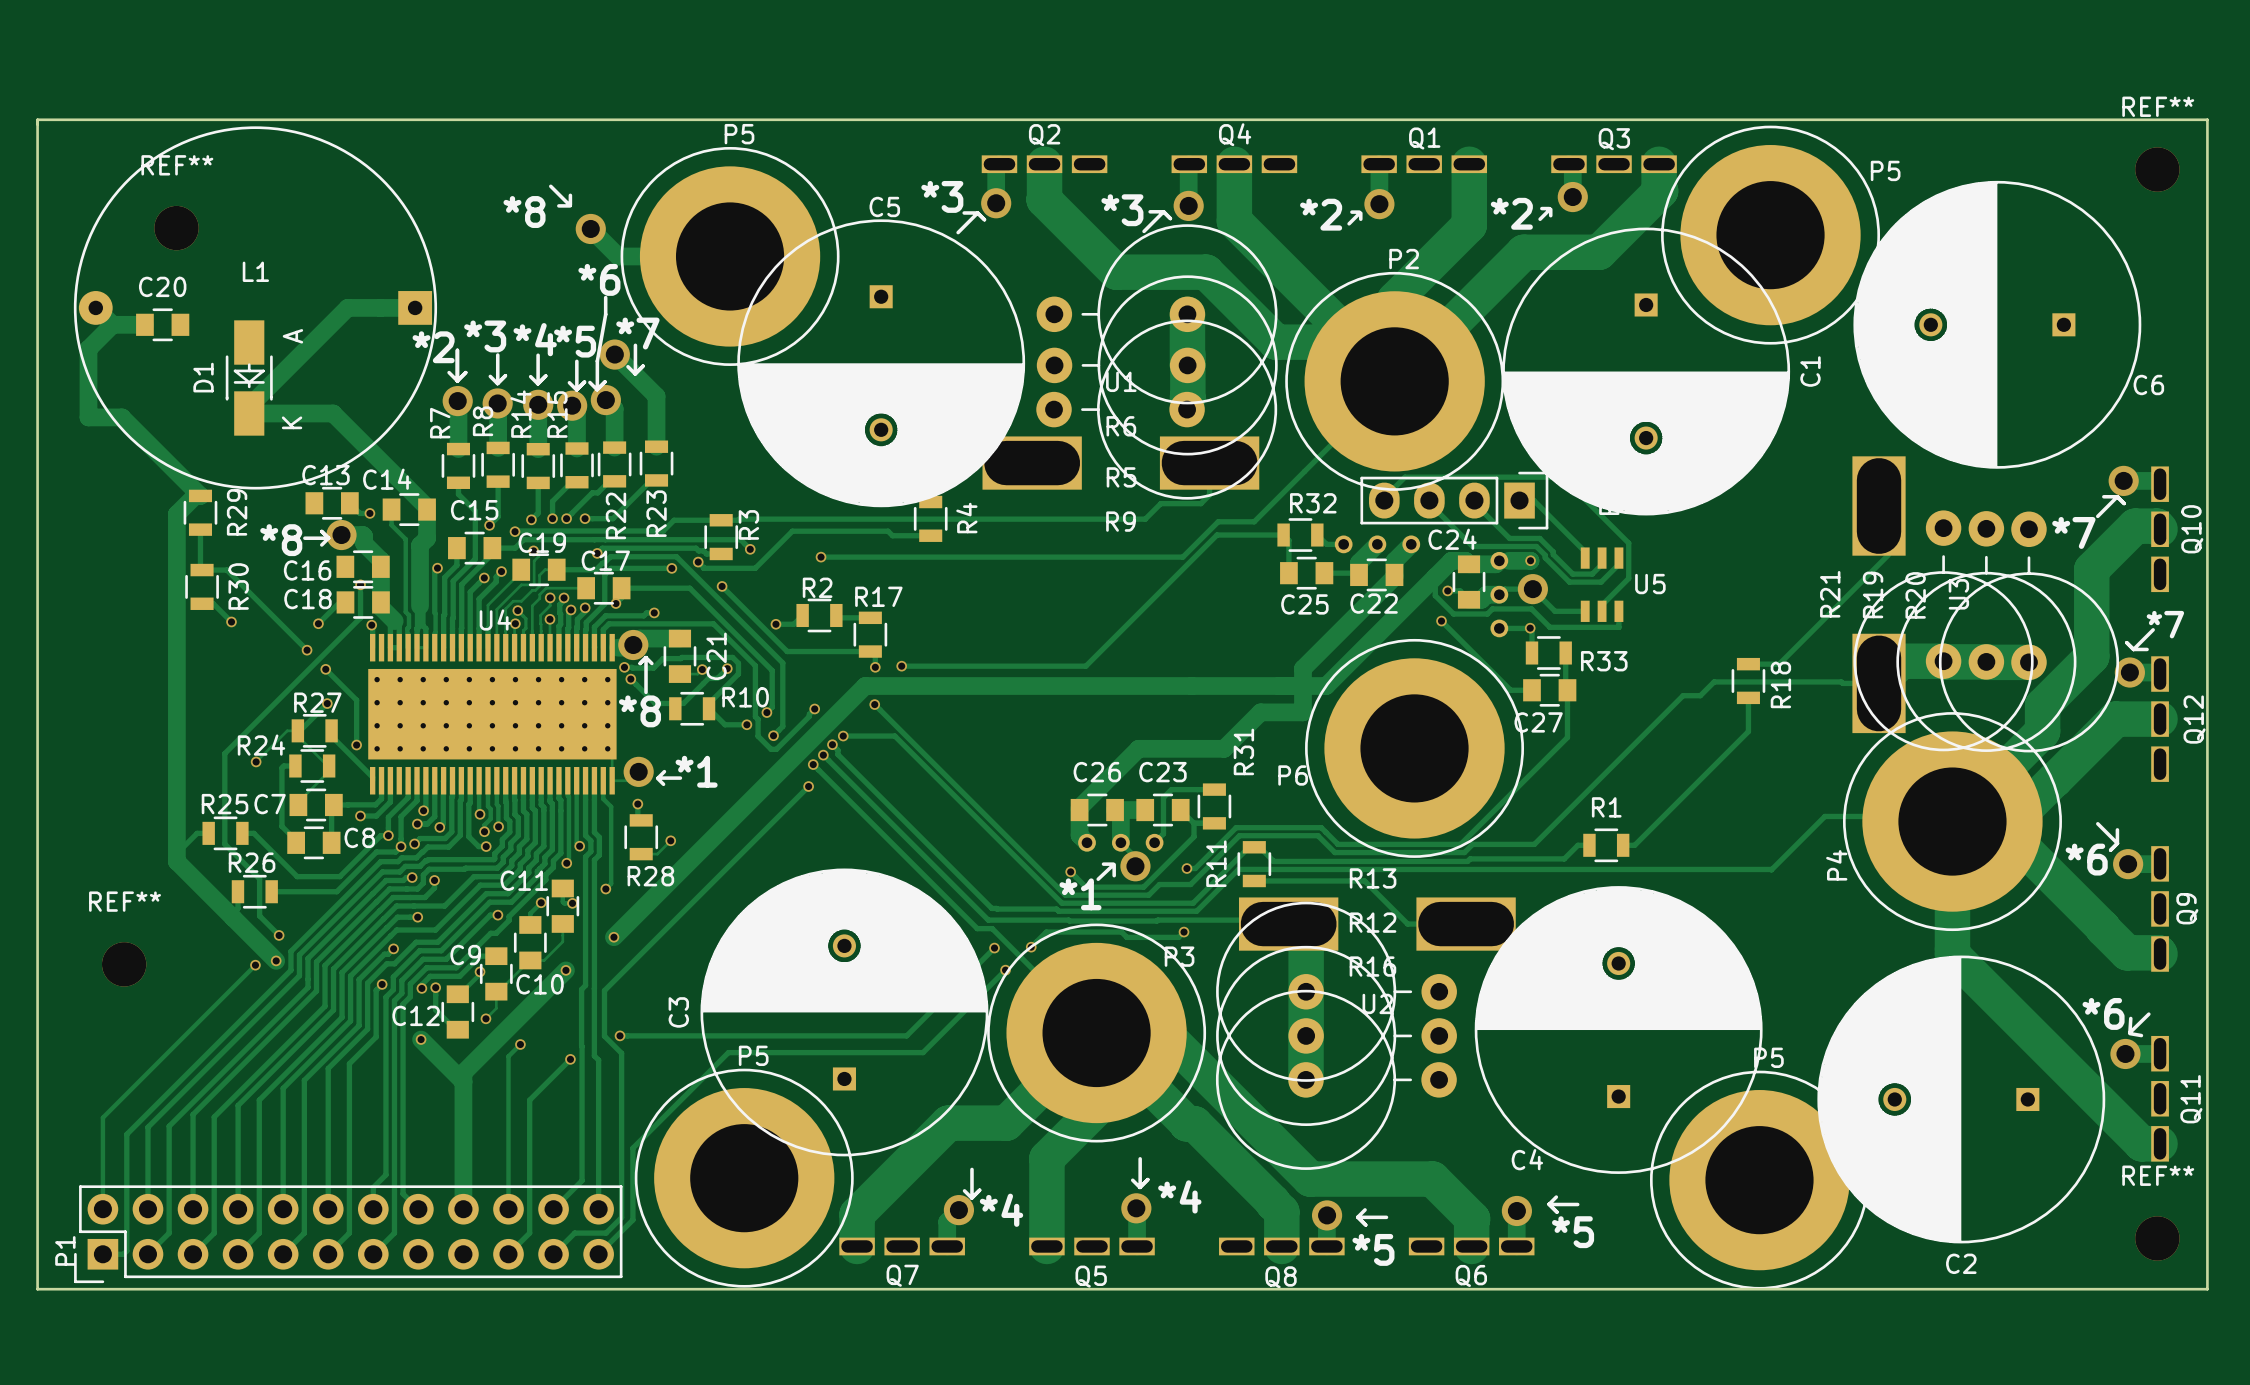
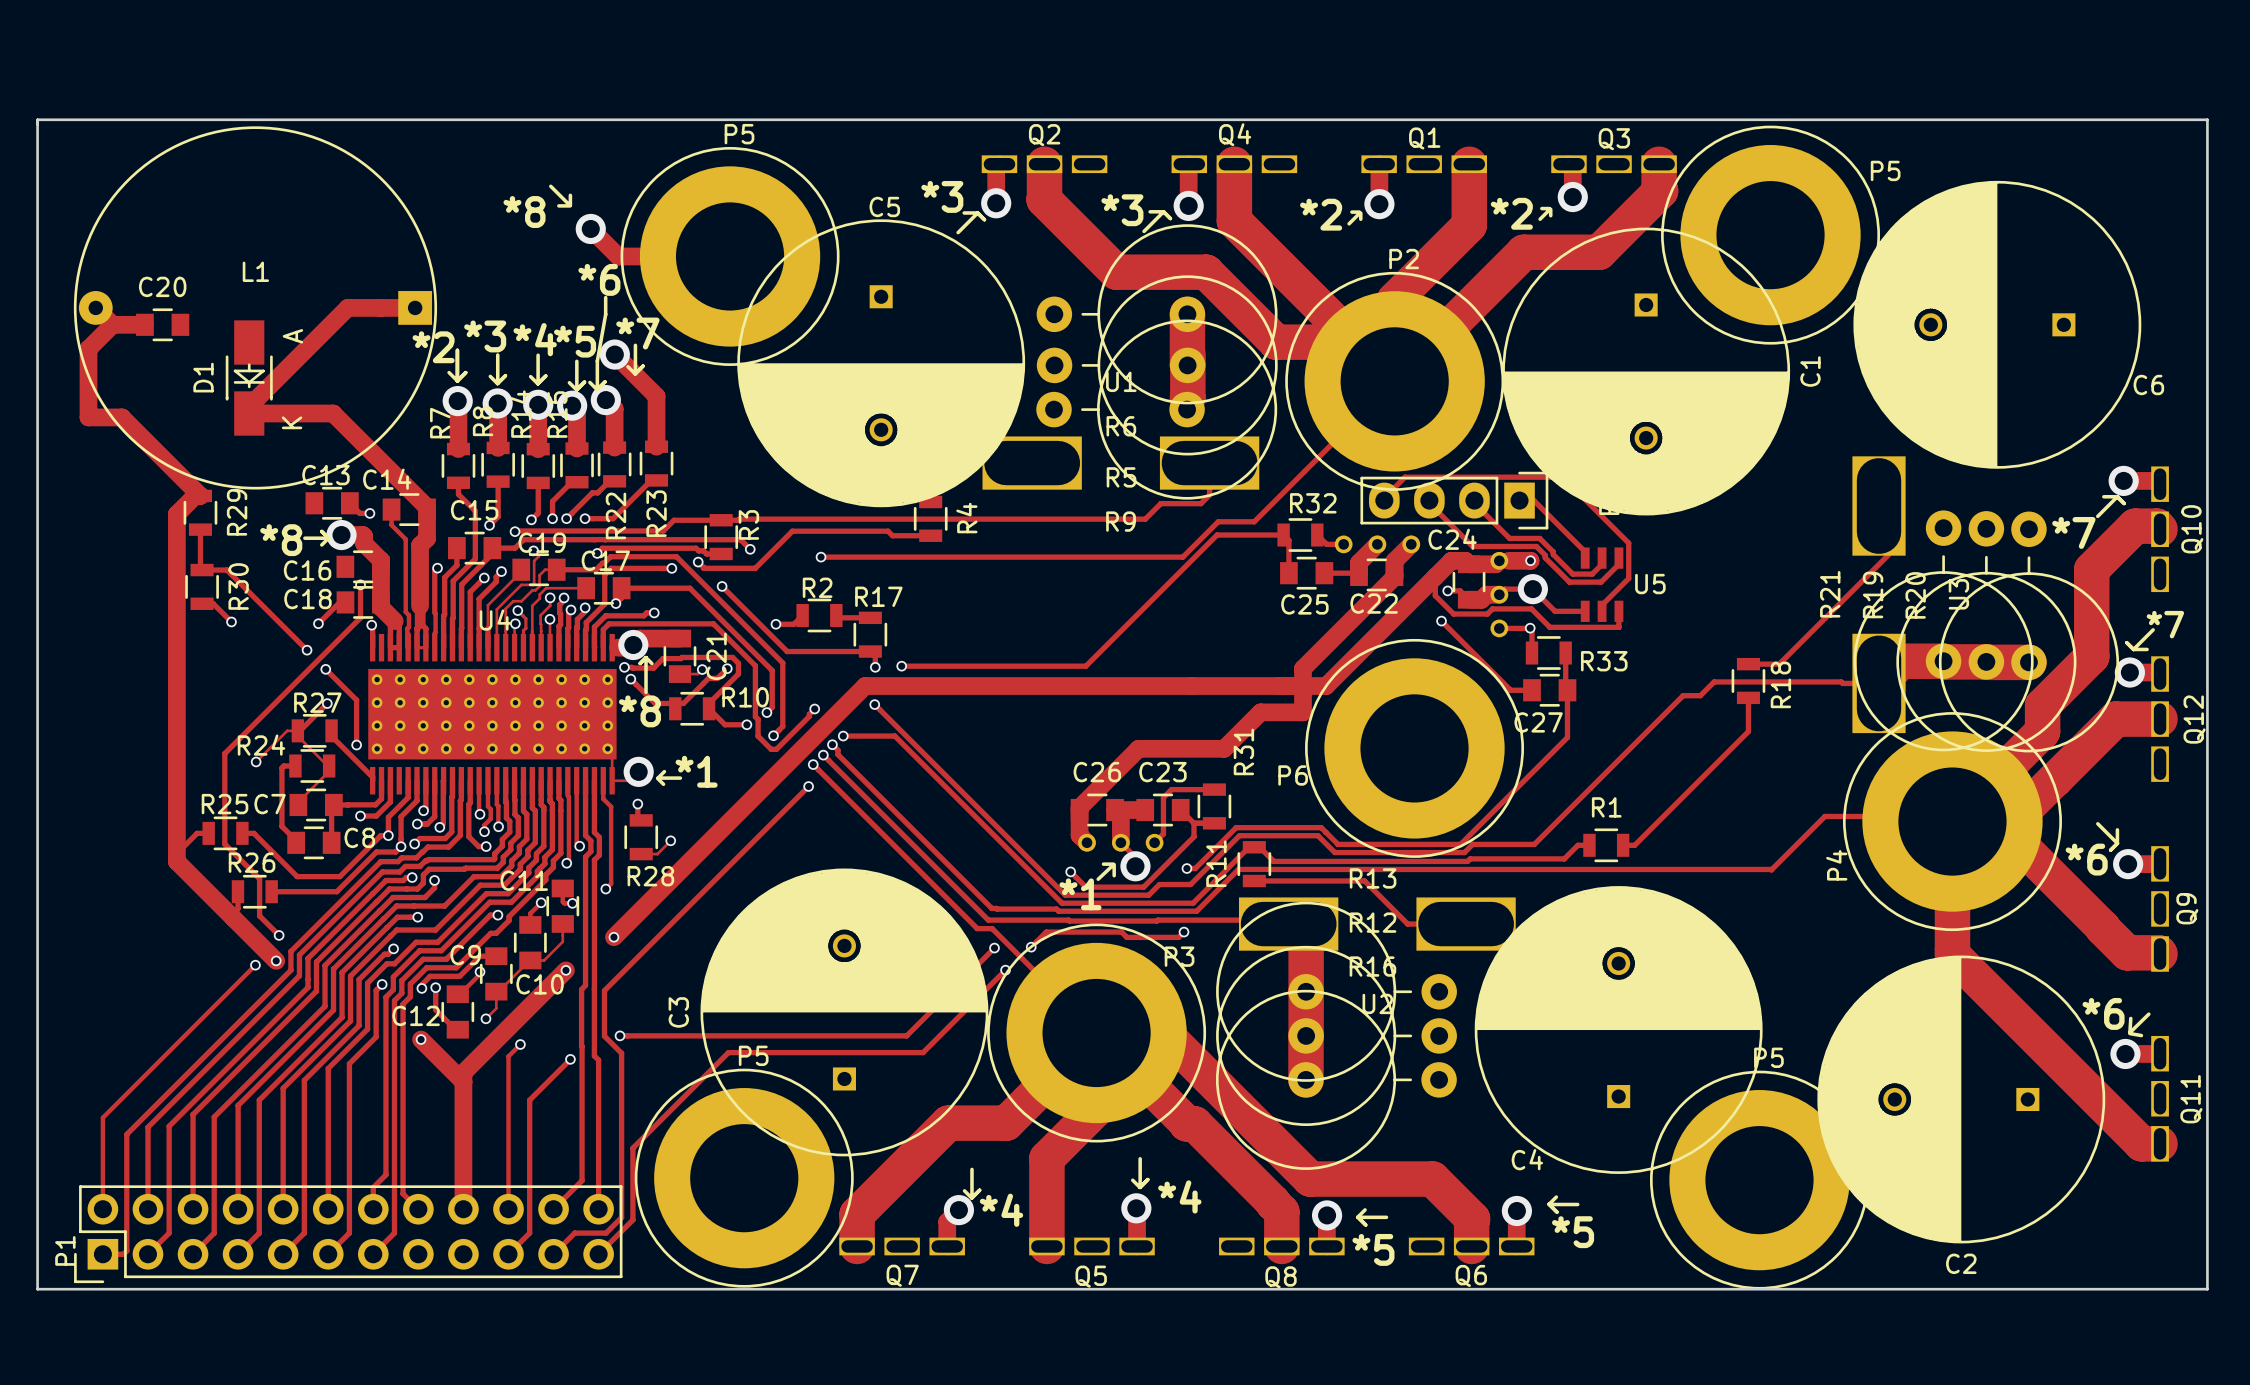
REF**: (2157, 169) -> none
REF**: (176, 228) -> none
REF**: (124, 964) -> none
REF**: (2157, 1238) -> none

